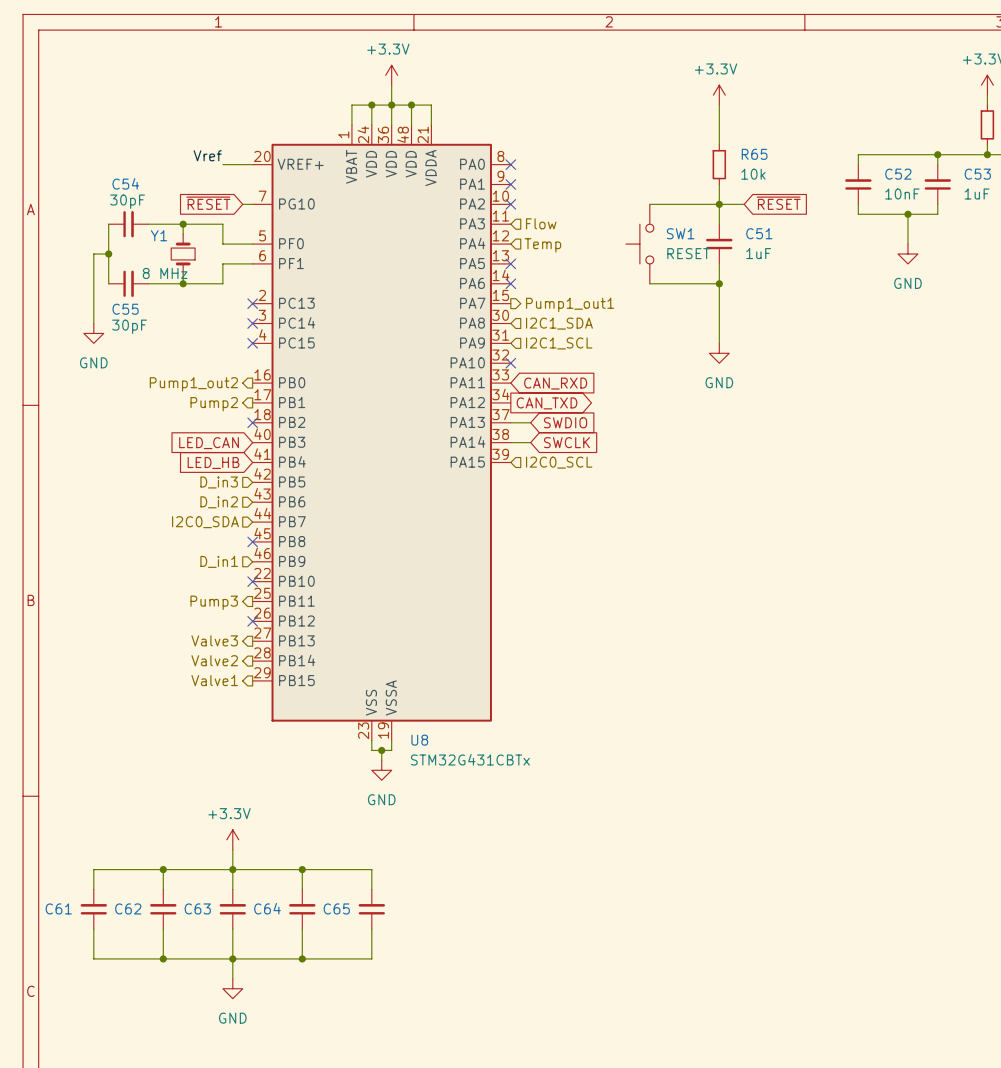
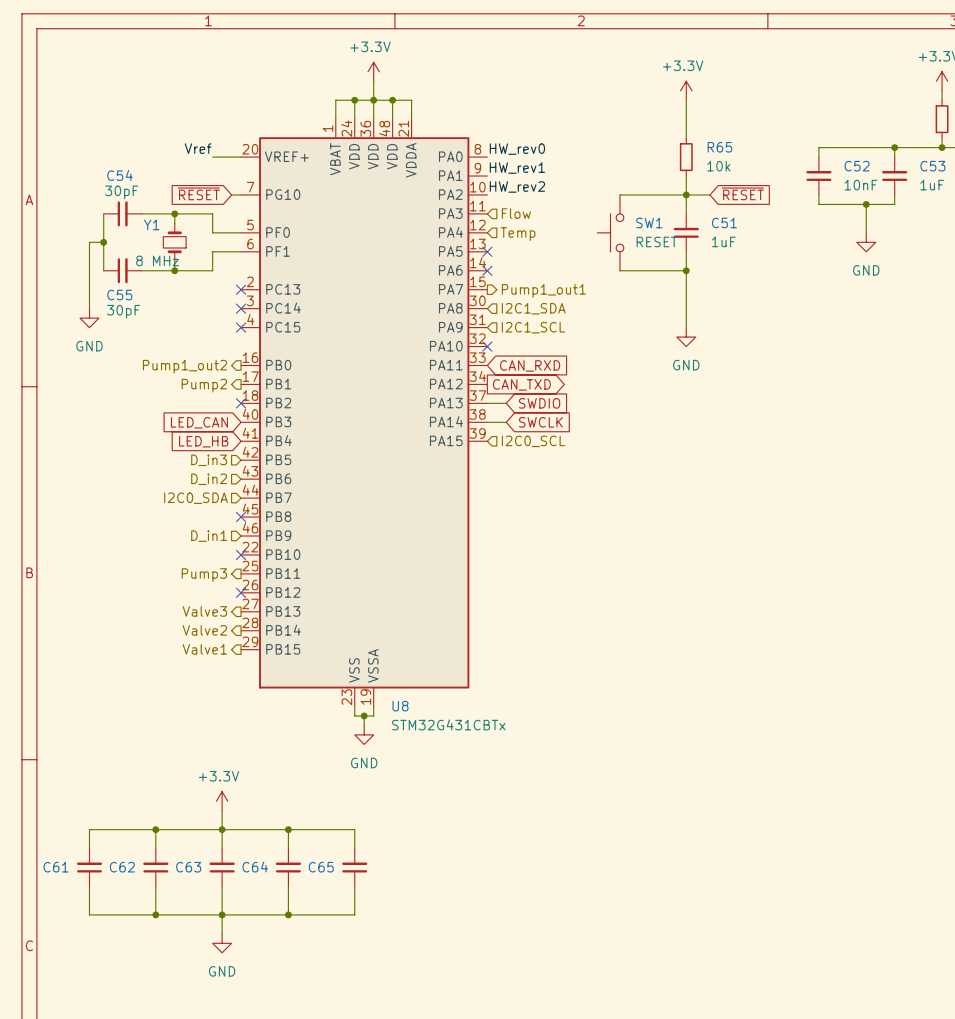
label: none -> HW_rev0 (517, 149)
no-connect mark: (510, 164) -> none
label: none -> HW_rev1 (517, 168)
no-connect mark: (510, 184) -> none
label: none -> HW_rev2 (517, 186)
no-connect mark: (510, 204) -> none

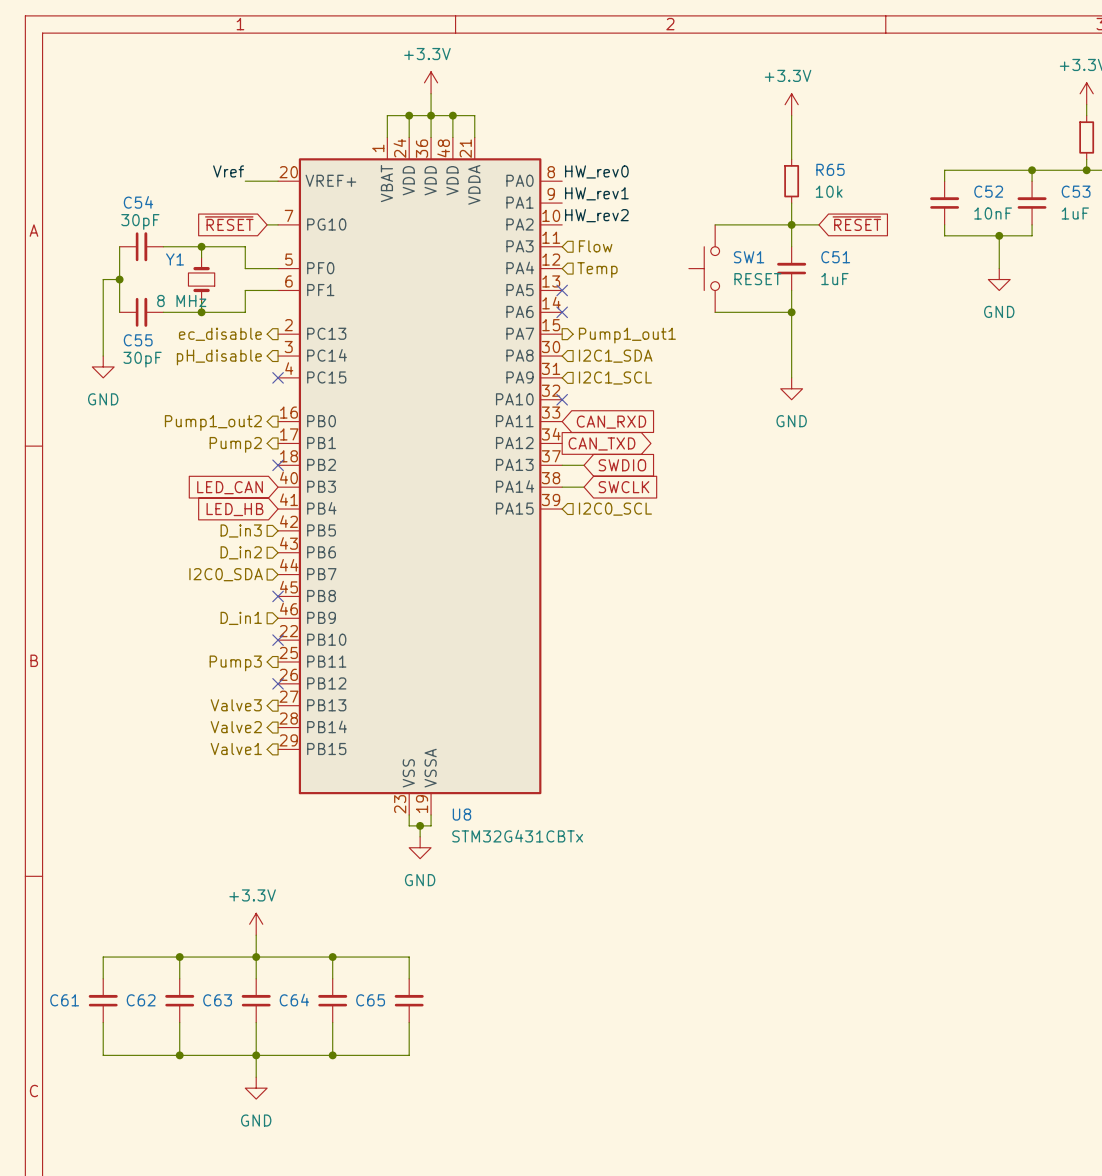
hierarchical label: none -> ec_disable (220, 334)
no-connect mark: (241, 289) -> none
no-connect mark: (241, 308) -> none
hierarchical label: none -> pH_disable (219, 357)

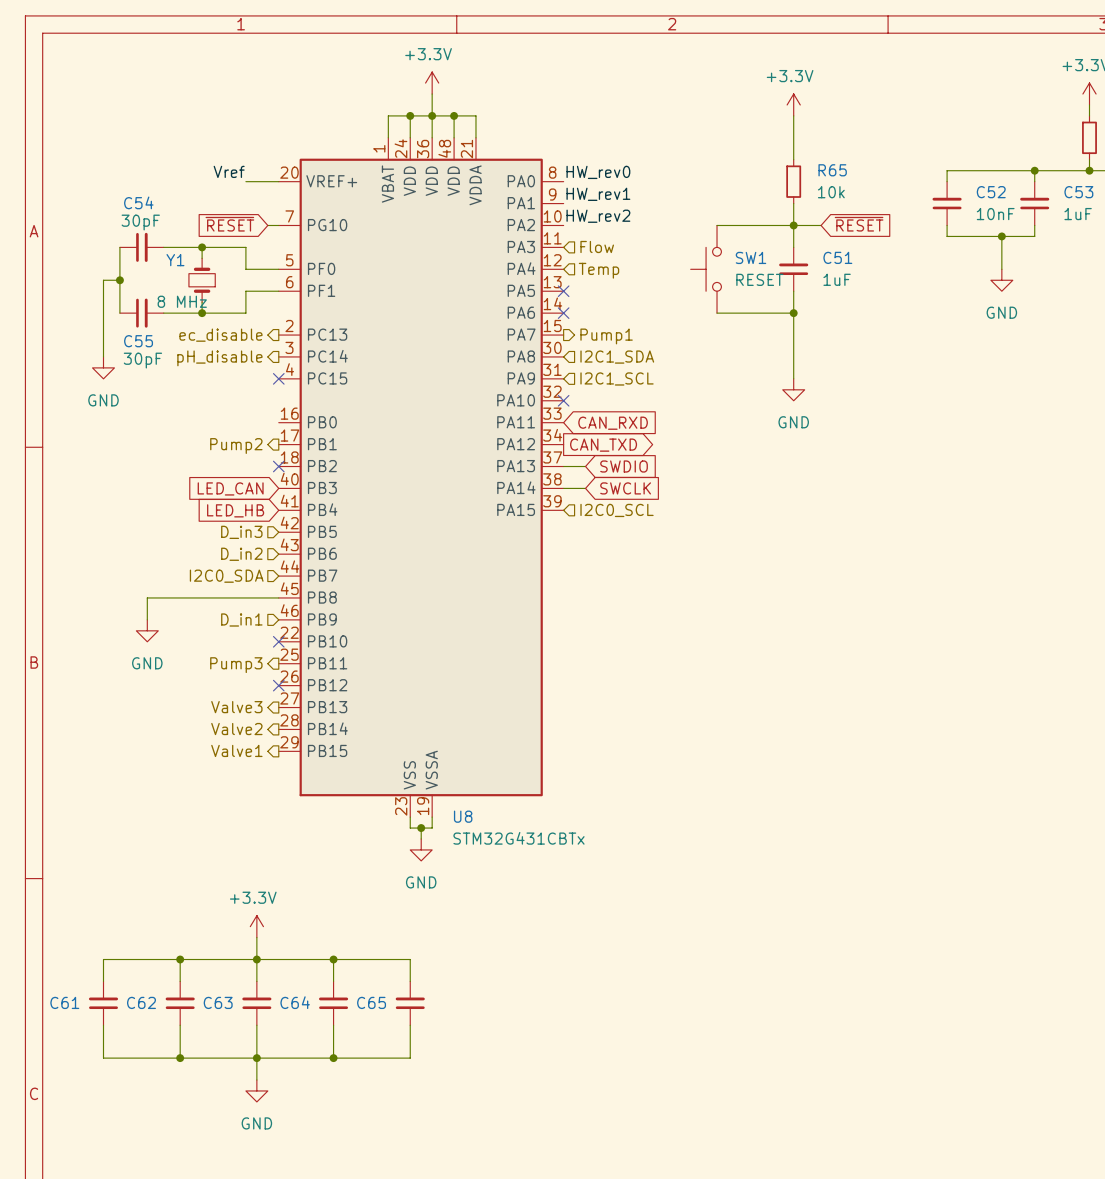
hierarchical label: Pump1_out1 (627, 335) -> Pump1 (606, 336)
hierarchical label: Pump1_out2 (213, 423) -> none
wire: none -> (278, 597) (147, 597) (147, 619)
no-connect mark: (278, 596) -> none
power symbol: none -> GND (147, 630)

